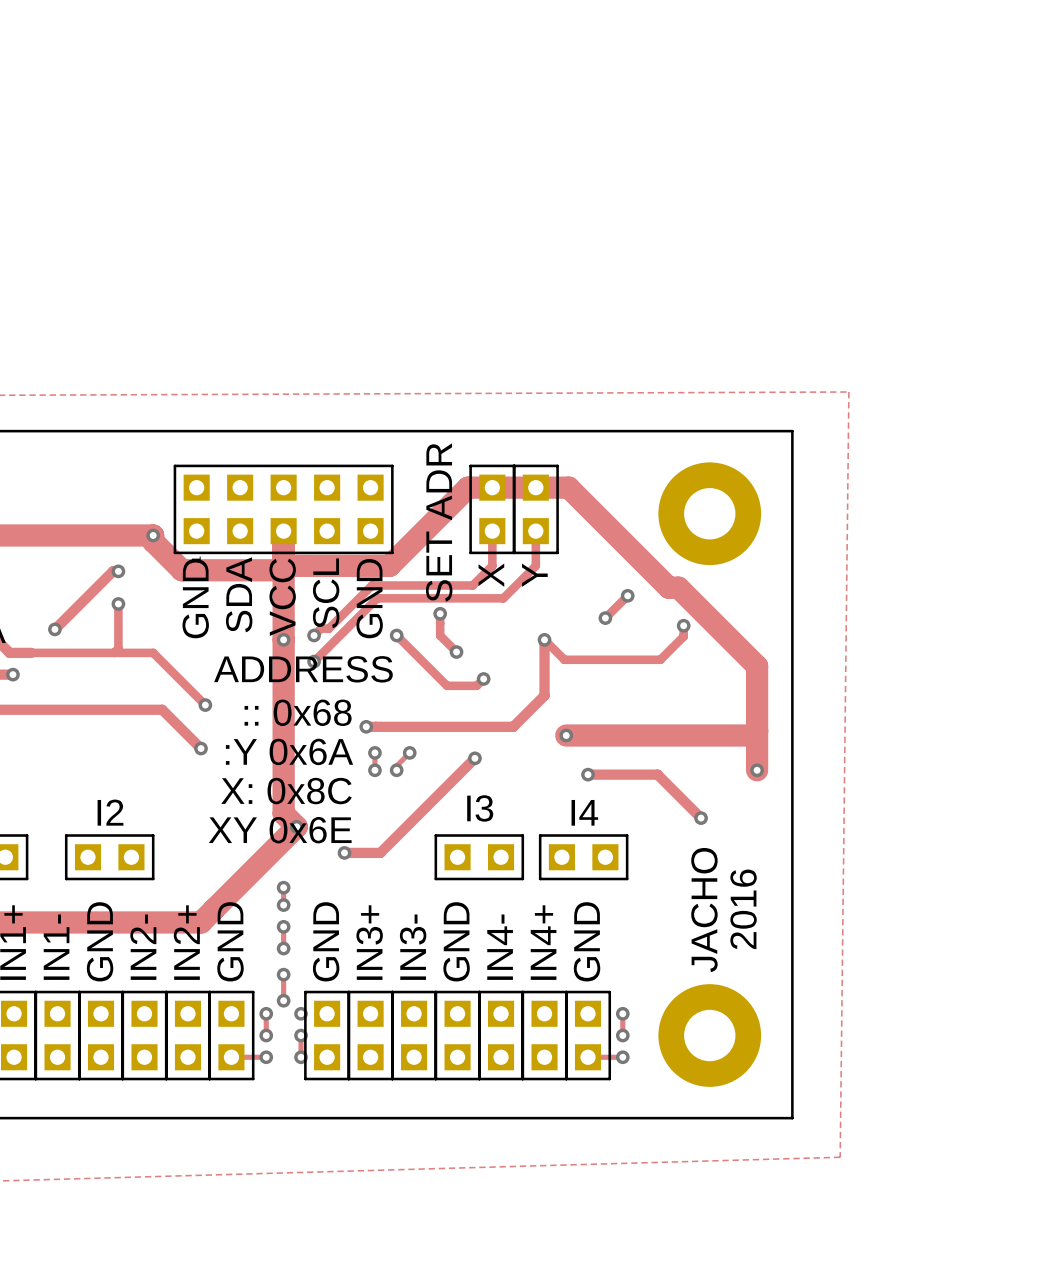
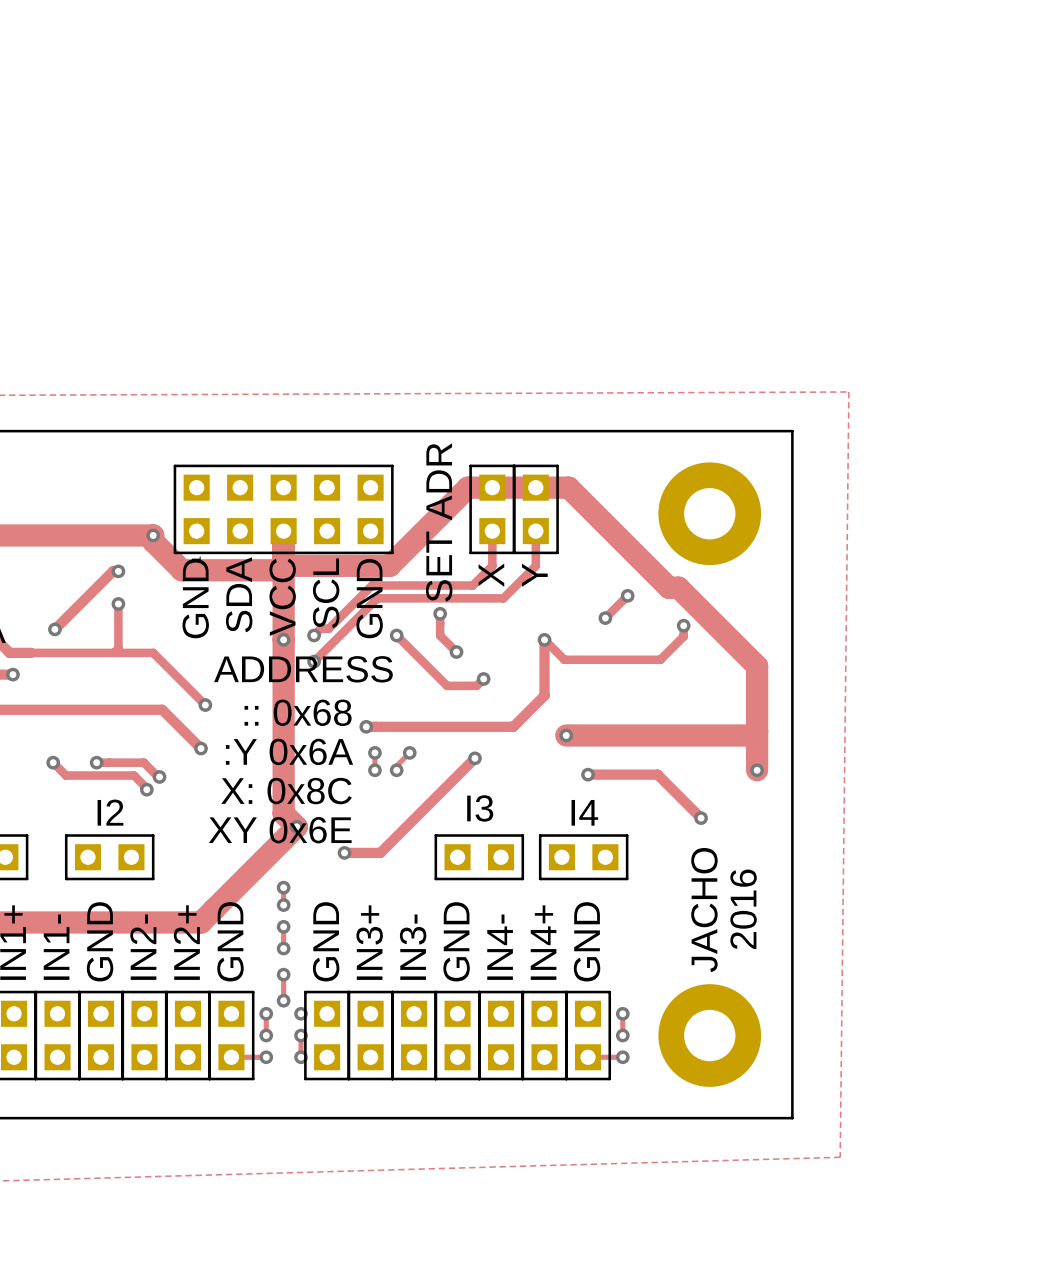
track: none -> (53, 762) (66, 775) (134, 775) (146, 789)
via: none -> (53, 762)
track: none -> (96, 762) (143, 762) (159, 776)
via: none -> (96, 762)
via: none -> (159, 776)
via: none -> (146, 789)

